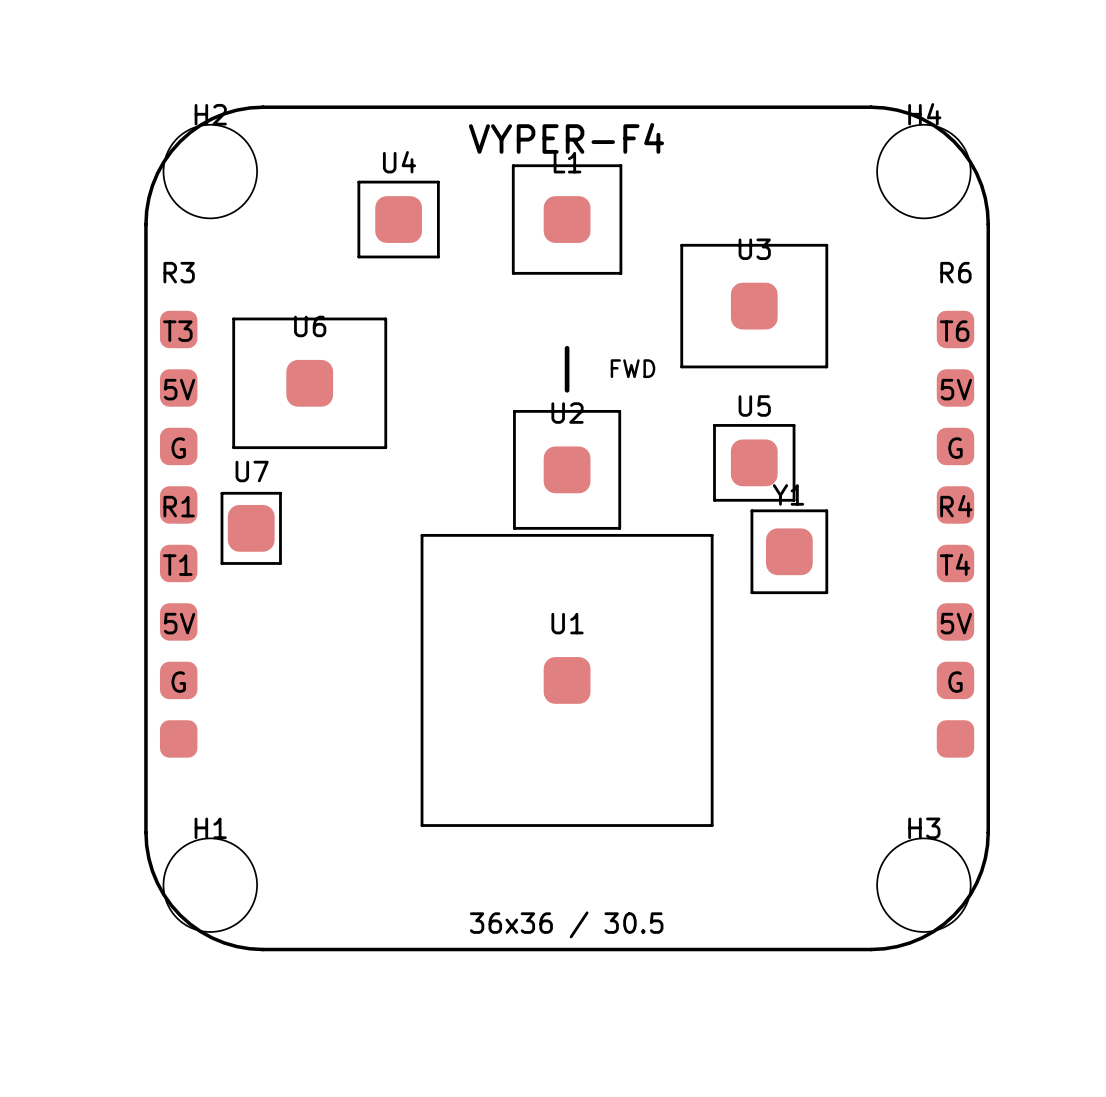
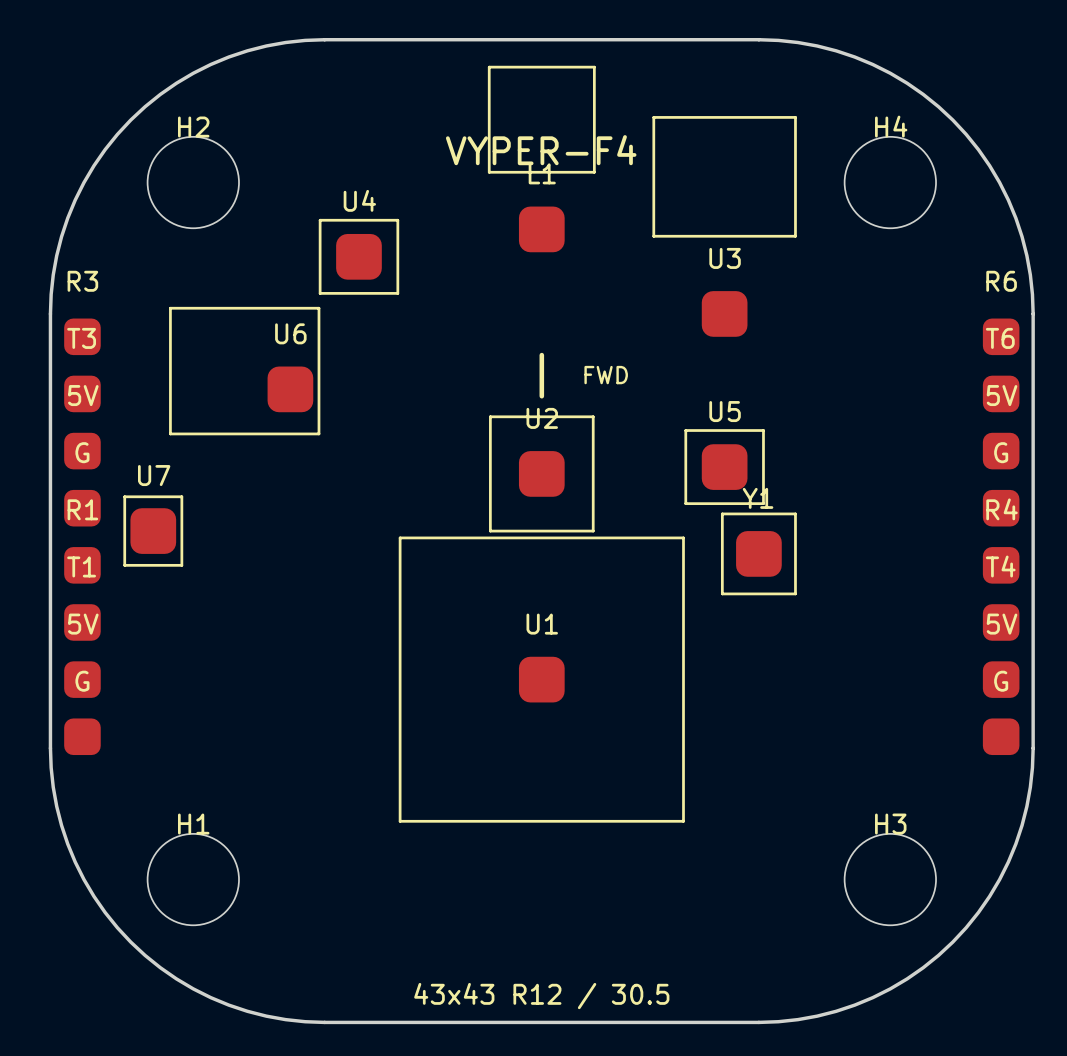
board edge: (262, 107) (884, 107) (909, 113) (933, 125) (962, 151) (981, 185) (988, 224) (988, 832) (985, 858) (976, 883) (962, 905) (944, 924) (909, 942) (871, 949) (262, 949) (236, 946) (212, 937) (189, 924) (171, 905) (152, 871) (145, 832) (146, 211) (152, 185) (163, 161) (189, 132) (224, 113) (262, 107) -> (324, 39) (285, 42) (247, 50) (210, 64) (160, 94) (130, 120) (93, 165) (75, 200) (61, 236) (53, 274) (50, 313) (51, 767) (61, 825) (75, 862) (93, 896) (130, 942) (160, 967) (193, 988) (247, 1011) (305, 1021) (778, 1021) (836, 1011) (872, 997) (907, 978) (952, 942) (978, 912) (999, 879) (1022, 825) (1032, 767) (1032, 294) (1022, 236) (1008, 200) (989, 165) (952, 120) (907, 83) (872, 64) (817, 45) (758, 39) (324, 39)
line: (513, 165) (620, 165) (620, 273) (513, 273) (513, 165) -> (489, 67) (594, 67) (594, 172) (489, 172) (489, 67)
line: (358, 182) (438, 182) (438, 256) (358, 256) (358, 182) -> (320, 220) (397, 220) (397, 293) (320, 293) (320, 220)
U4 position: (398, 219) -> (358, 256)
line: (681, 245) (826, 245) (826, 366) (681, 366) (681, 245) -> (653, 117) (795, 117) (795, 236) (653, 236) (653, 117)
line: (233, 318) (385, 318) (385, 447) (233, 447) (233, 318) -> (170, 308) (318, 308) (318, 433) (170, 433) (170, 308)
R3 position: (178, 329) -> (82, 336)
R6 position: (955, 329) -> (1001, 336)
T3 position: (178, 387) -> (82, 393)
T6 position: (955, 387) -> (1001, 393)
5V position: (178, 446) -> (82, 451)
5V position: (955, 446) -> (1001, 451)
line: (221, 493) (280, 493) (280, 563) (221, 563) (221, 493) -> (124, 496) (181, 496) (181, 565) (124, 565) (124, 496)
G position: (178, 504) -> (82, 508)
G position: (955, 504) -> (1001, 508)
U7 position: (251, 528) -> (153, 531)
R1 position: (178, 563) -> (82, 565)
R4 position: (955, 563) -> (1001, 565)
T1 position: (178, 621) -> (82, 622)
T4 position: (955, 621) -> (1001, 622)
5V position: (178, 680) -> (82, 679)
5V position: (955, 680) -> (1001, 679)
G position: (178, 738) -> (82, 736)
G position: (955, 738) -> (1001, 736)
text: 36x36 / 30.5 (566, 924) -> none
text: none -> 43x43 R12 / 30.5 (541, 996)

